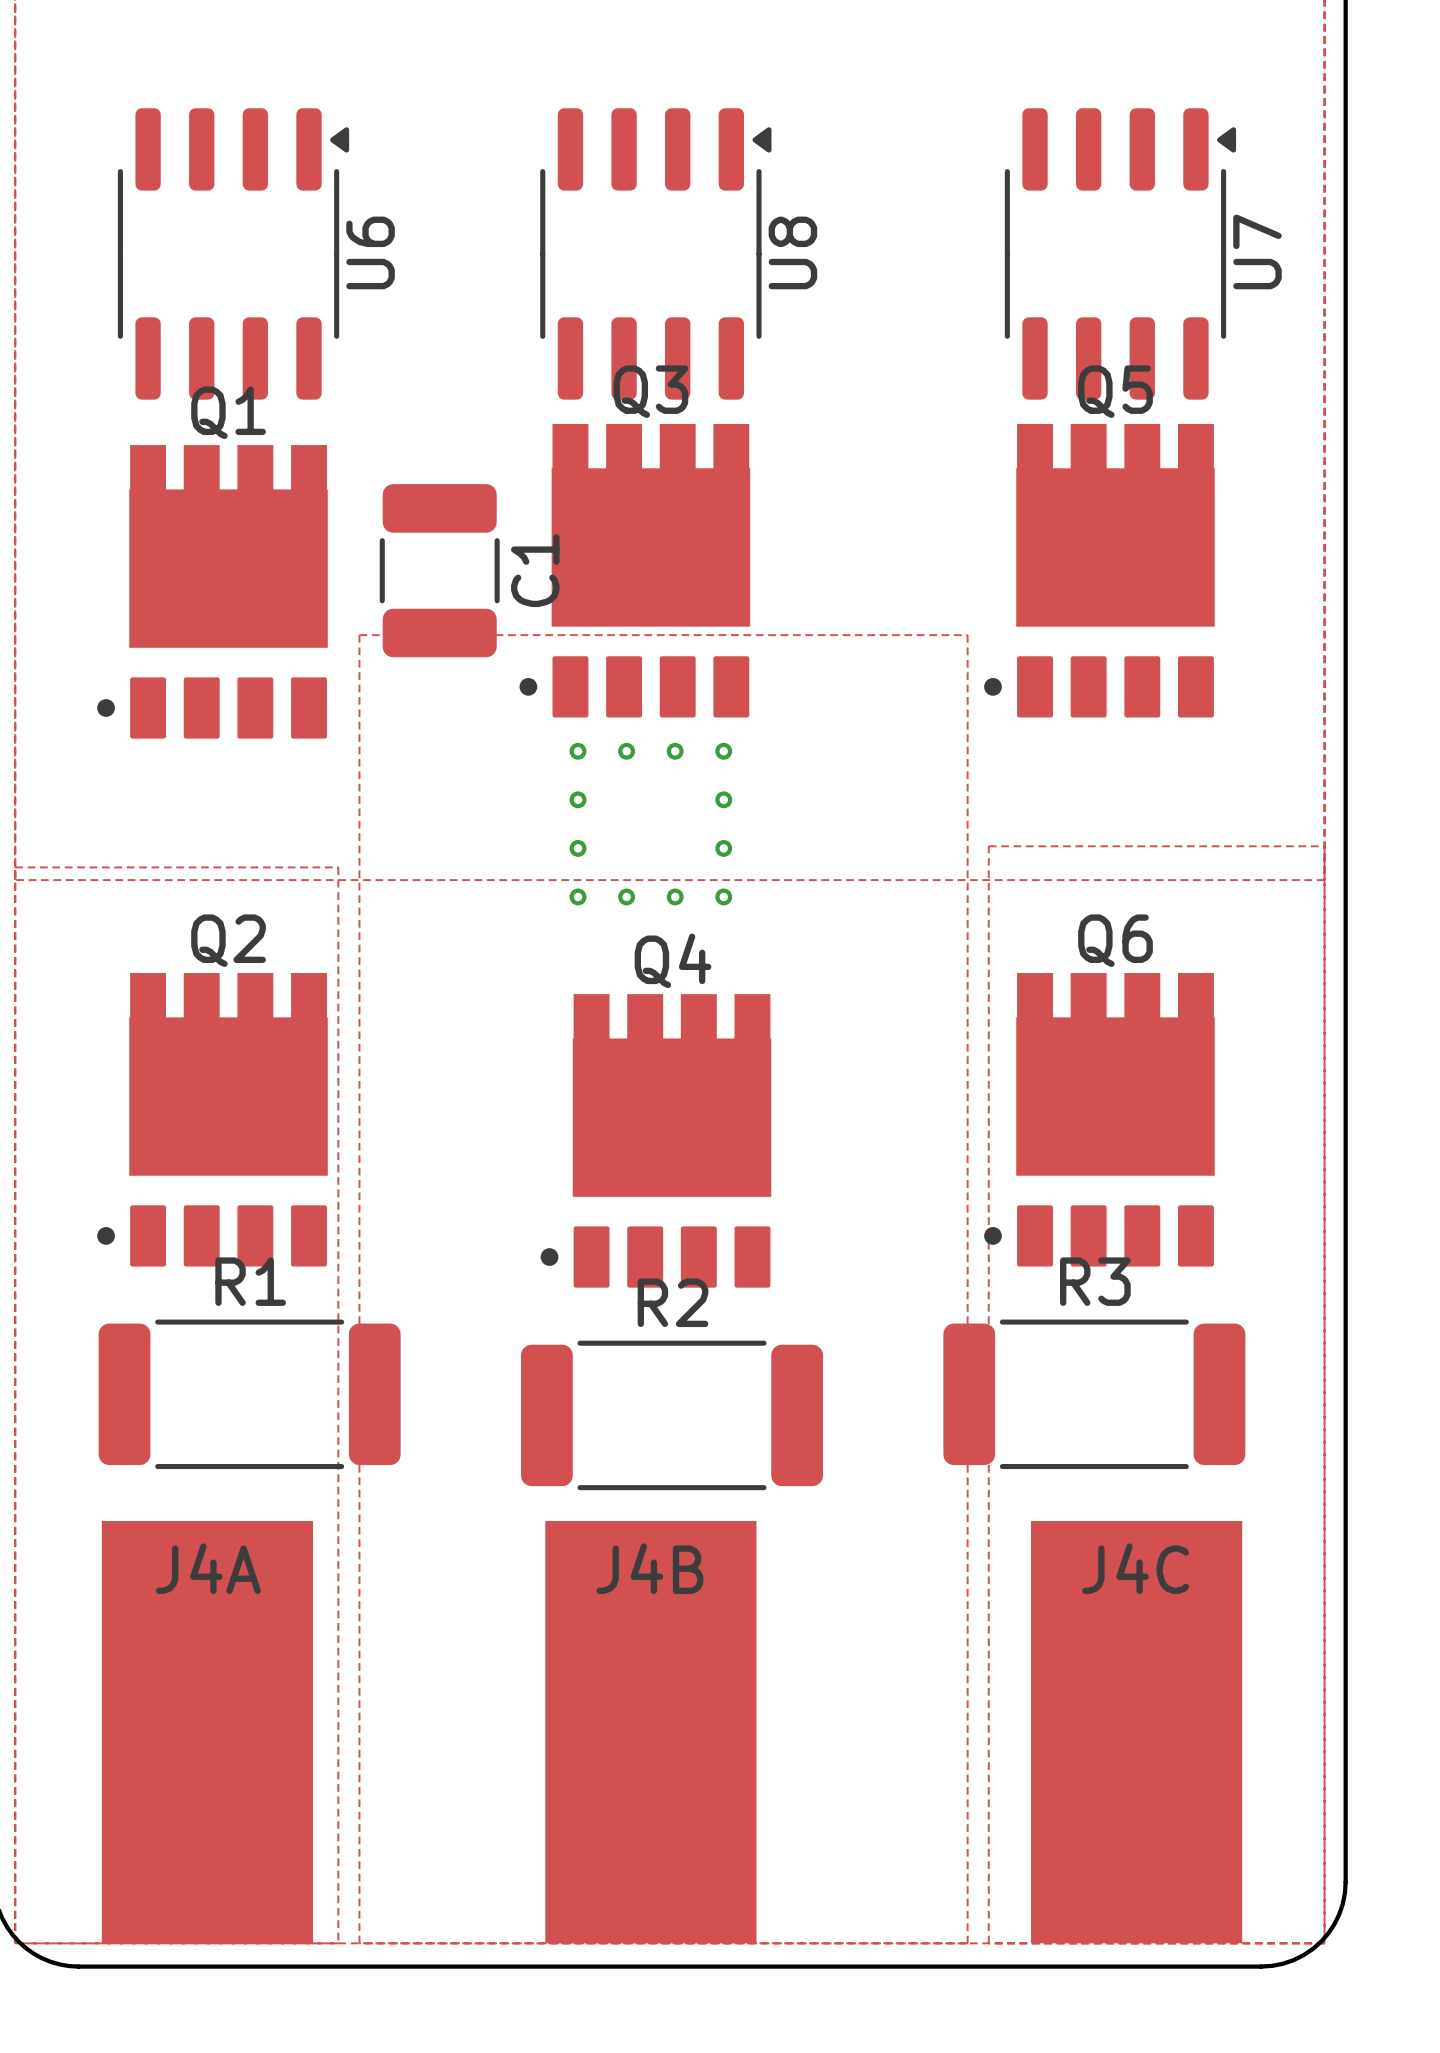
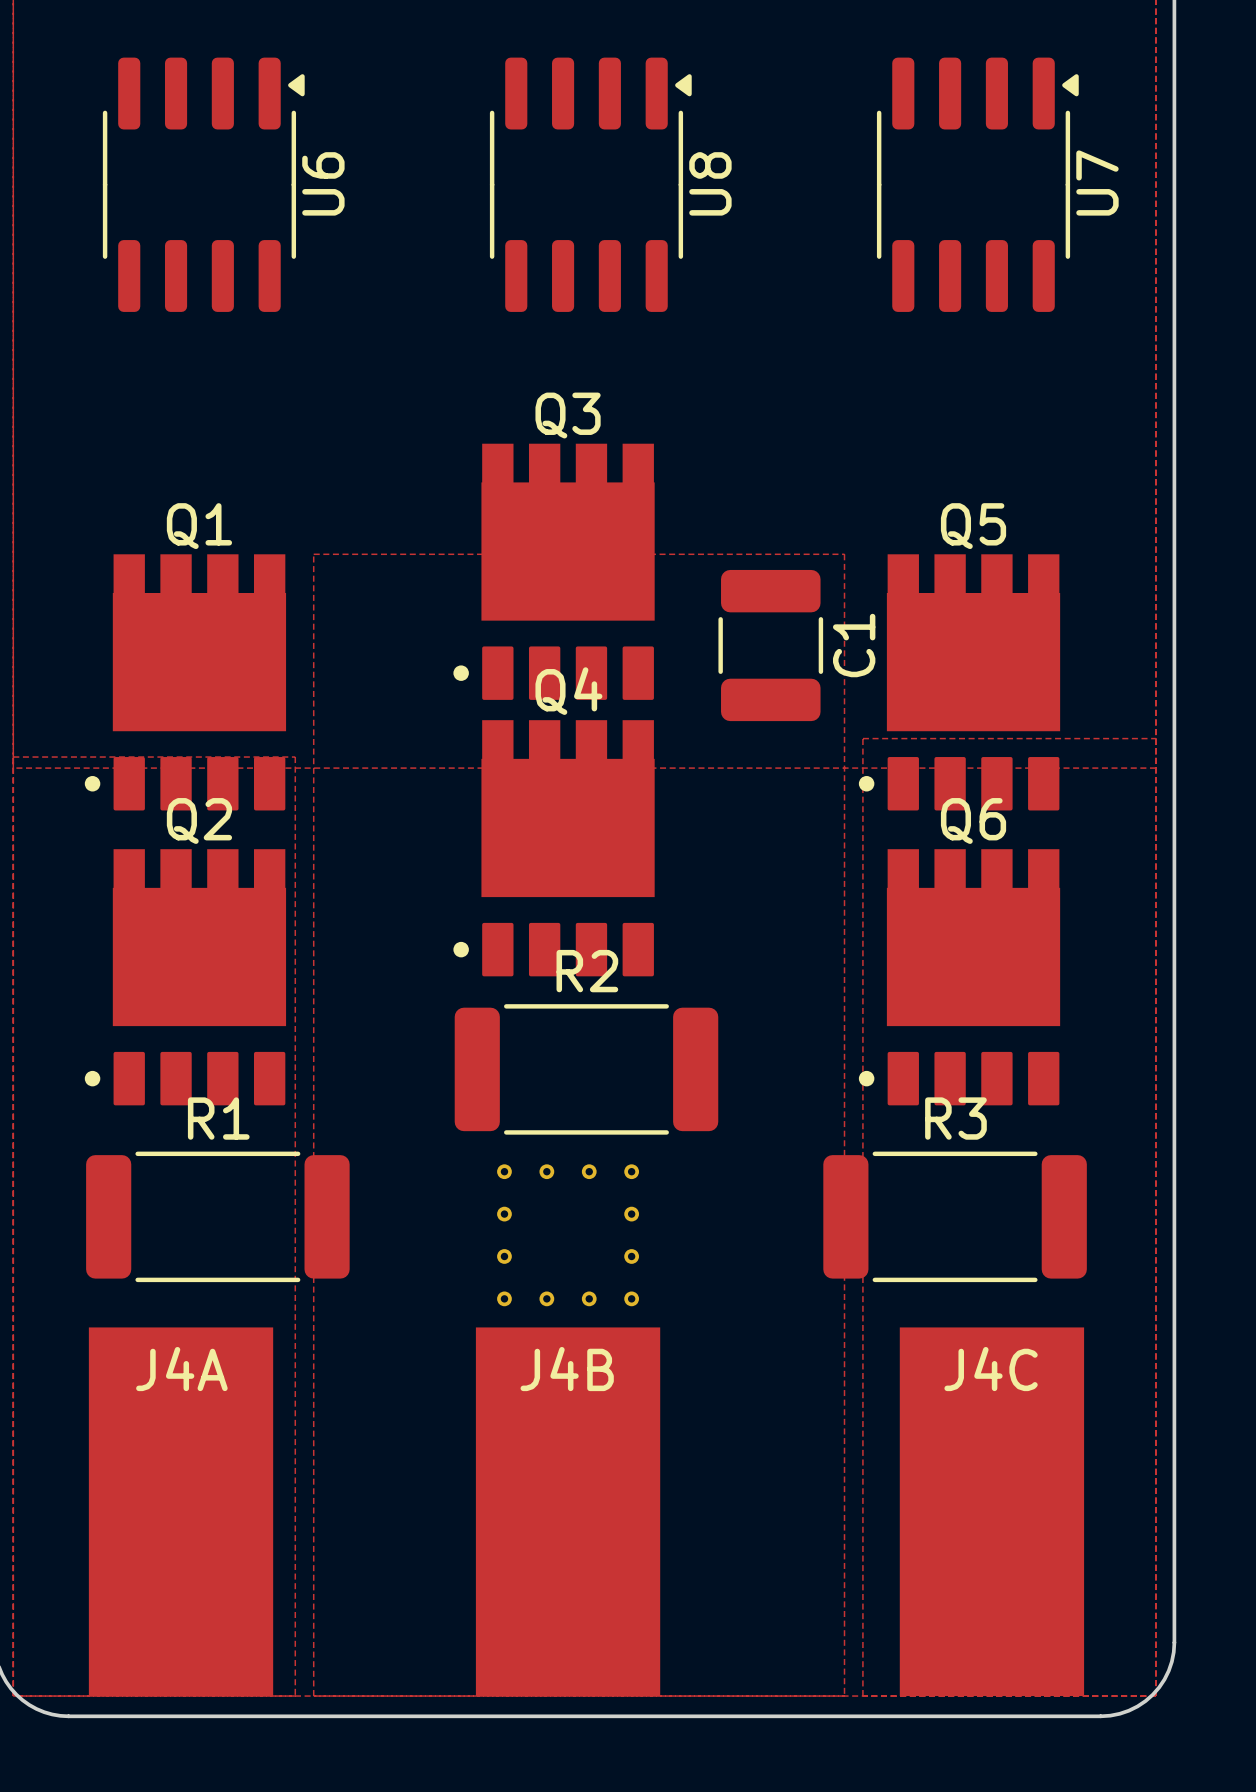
U6 position: (233, 253) -> (203, 184)
U8 position: (655, 253) -> (590, 184)
U7 position: (1120, 253) -> (977, 184)
C1 position: (439, 570) -> (770, 645)
Q3 position: (634, 570) -> (554, 571)
Q5 position: (1099, 570) -> (959, 682)
Q1 position: (212, 591) -> (185, 682)
part position: (650, 824) -> (568, 1235)
Q4 position: (655, 1140) -> (554, 848)
R2 position: (672, 1415) -> (586, 1069)

